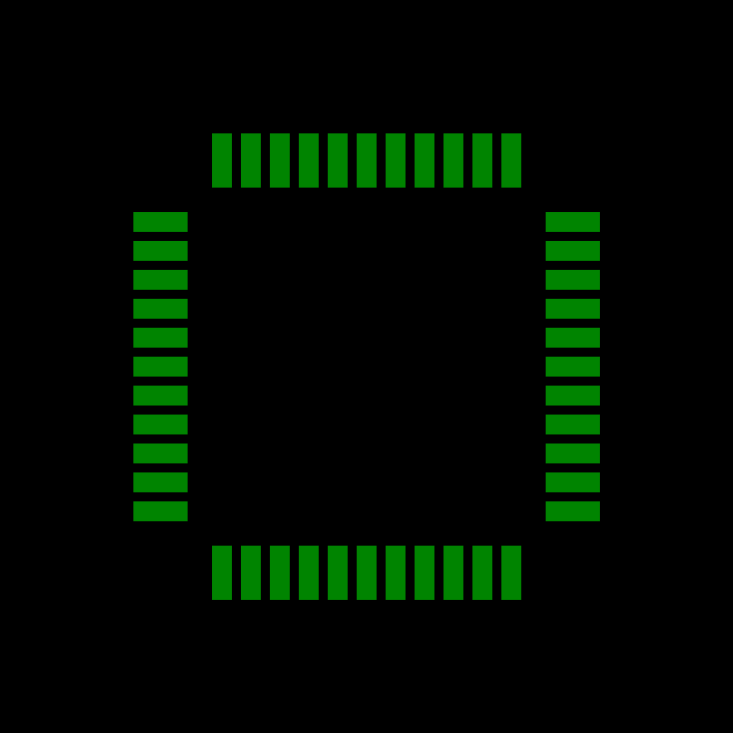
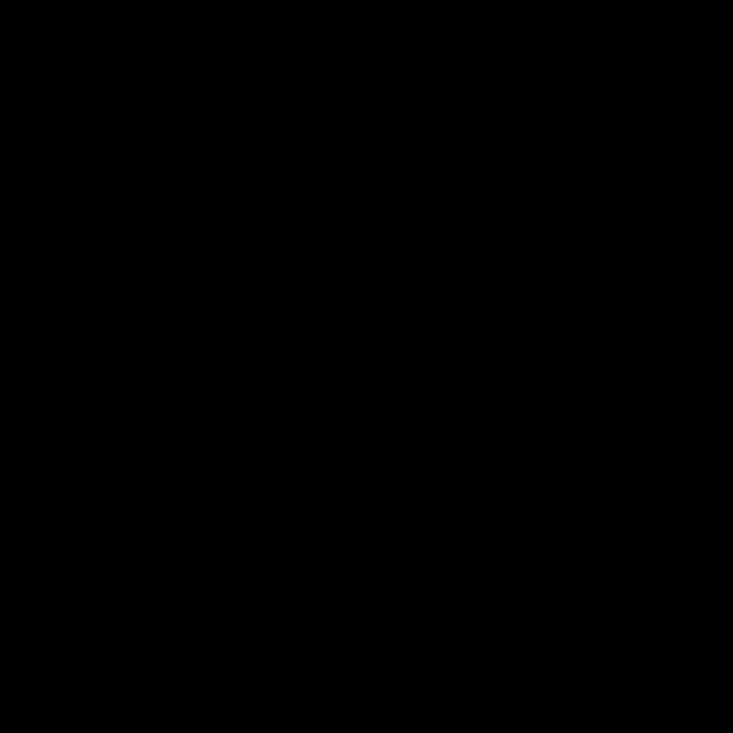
part: (366, 366) -> none

